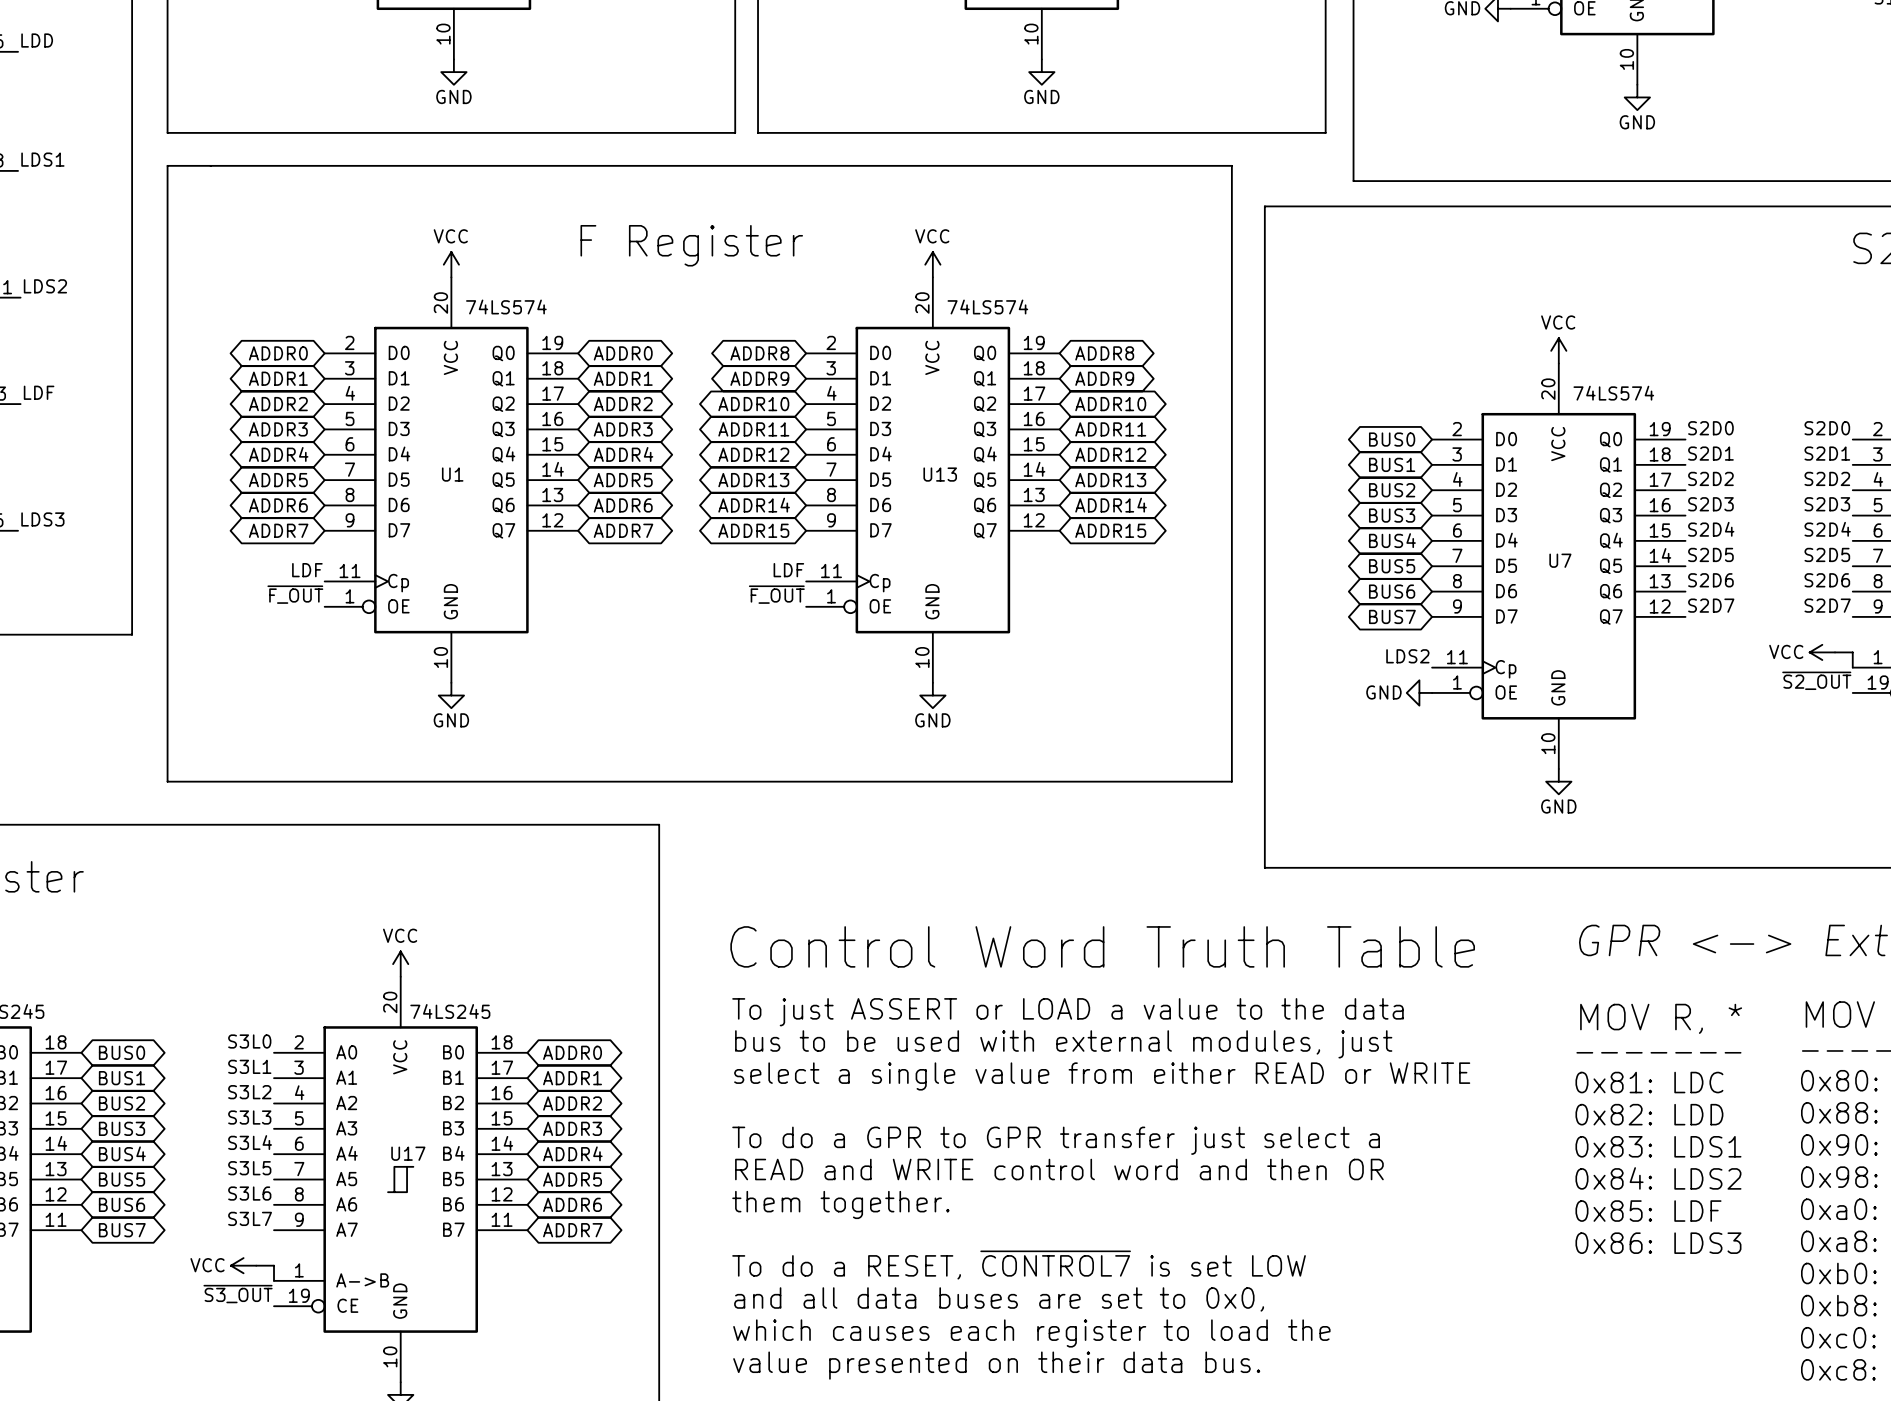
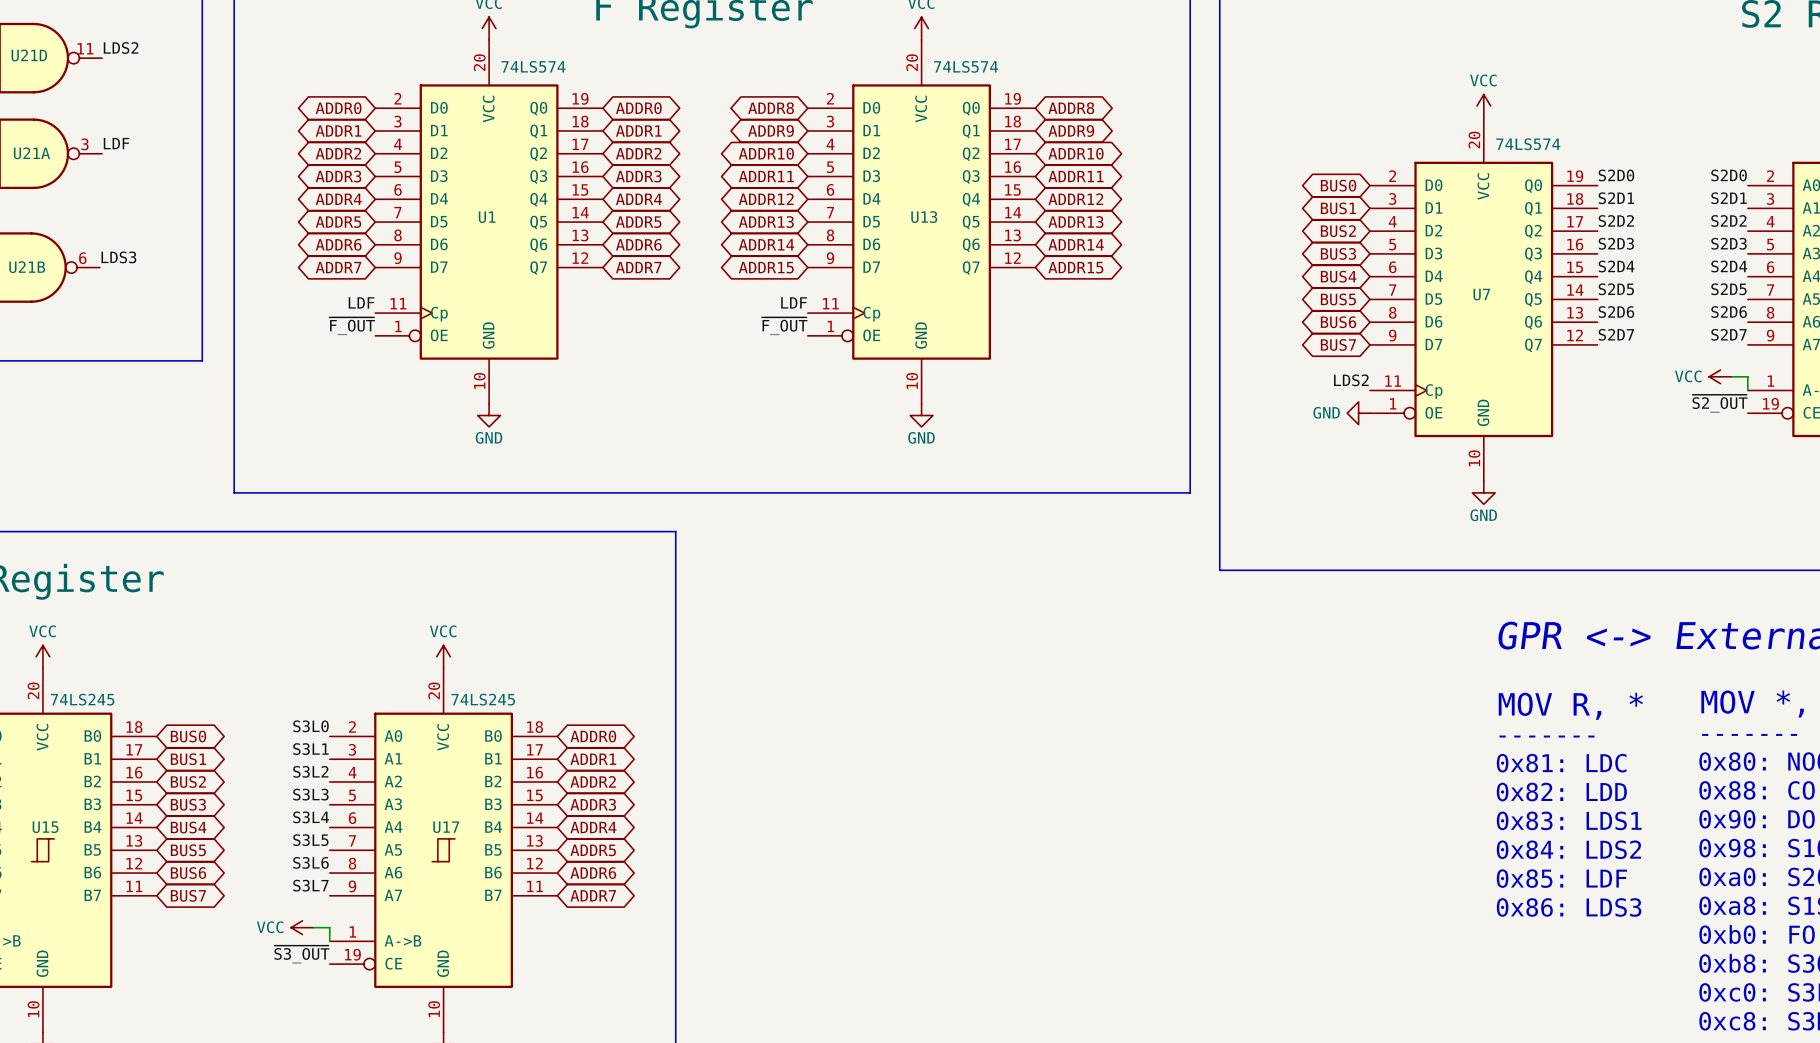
text: Control Word Truth Table (1102, 946) -> none
text: To just ASSERT or LOAD a value to the data (1067, 1012) -> none
text: bus to be used with external modules, just (1063, 1044) -> none
text: select a single value from either READ or WRITE (1102, 1076) -> none
text: To do a GPR to GPR transfer just select a (1056, 1140) -> none
text: READ and WRITE control word and then OR (1059, 1169) -> none
text: them together. (840, 1204) -> none
text: To do a RESET, ~{CONTROL7} is set LOW (1019, 1265) -> none
text: and all data buses are set to 0x0, (999, 1299) -> none
text: which causes each register to load the (1031, 1333) -> none
text: value presented on their data bus. (996, 1365) -> none

